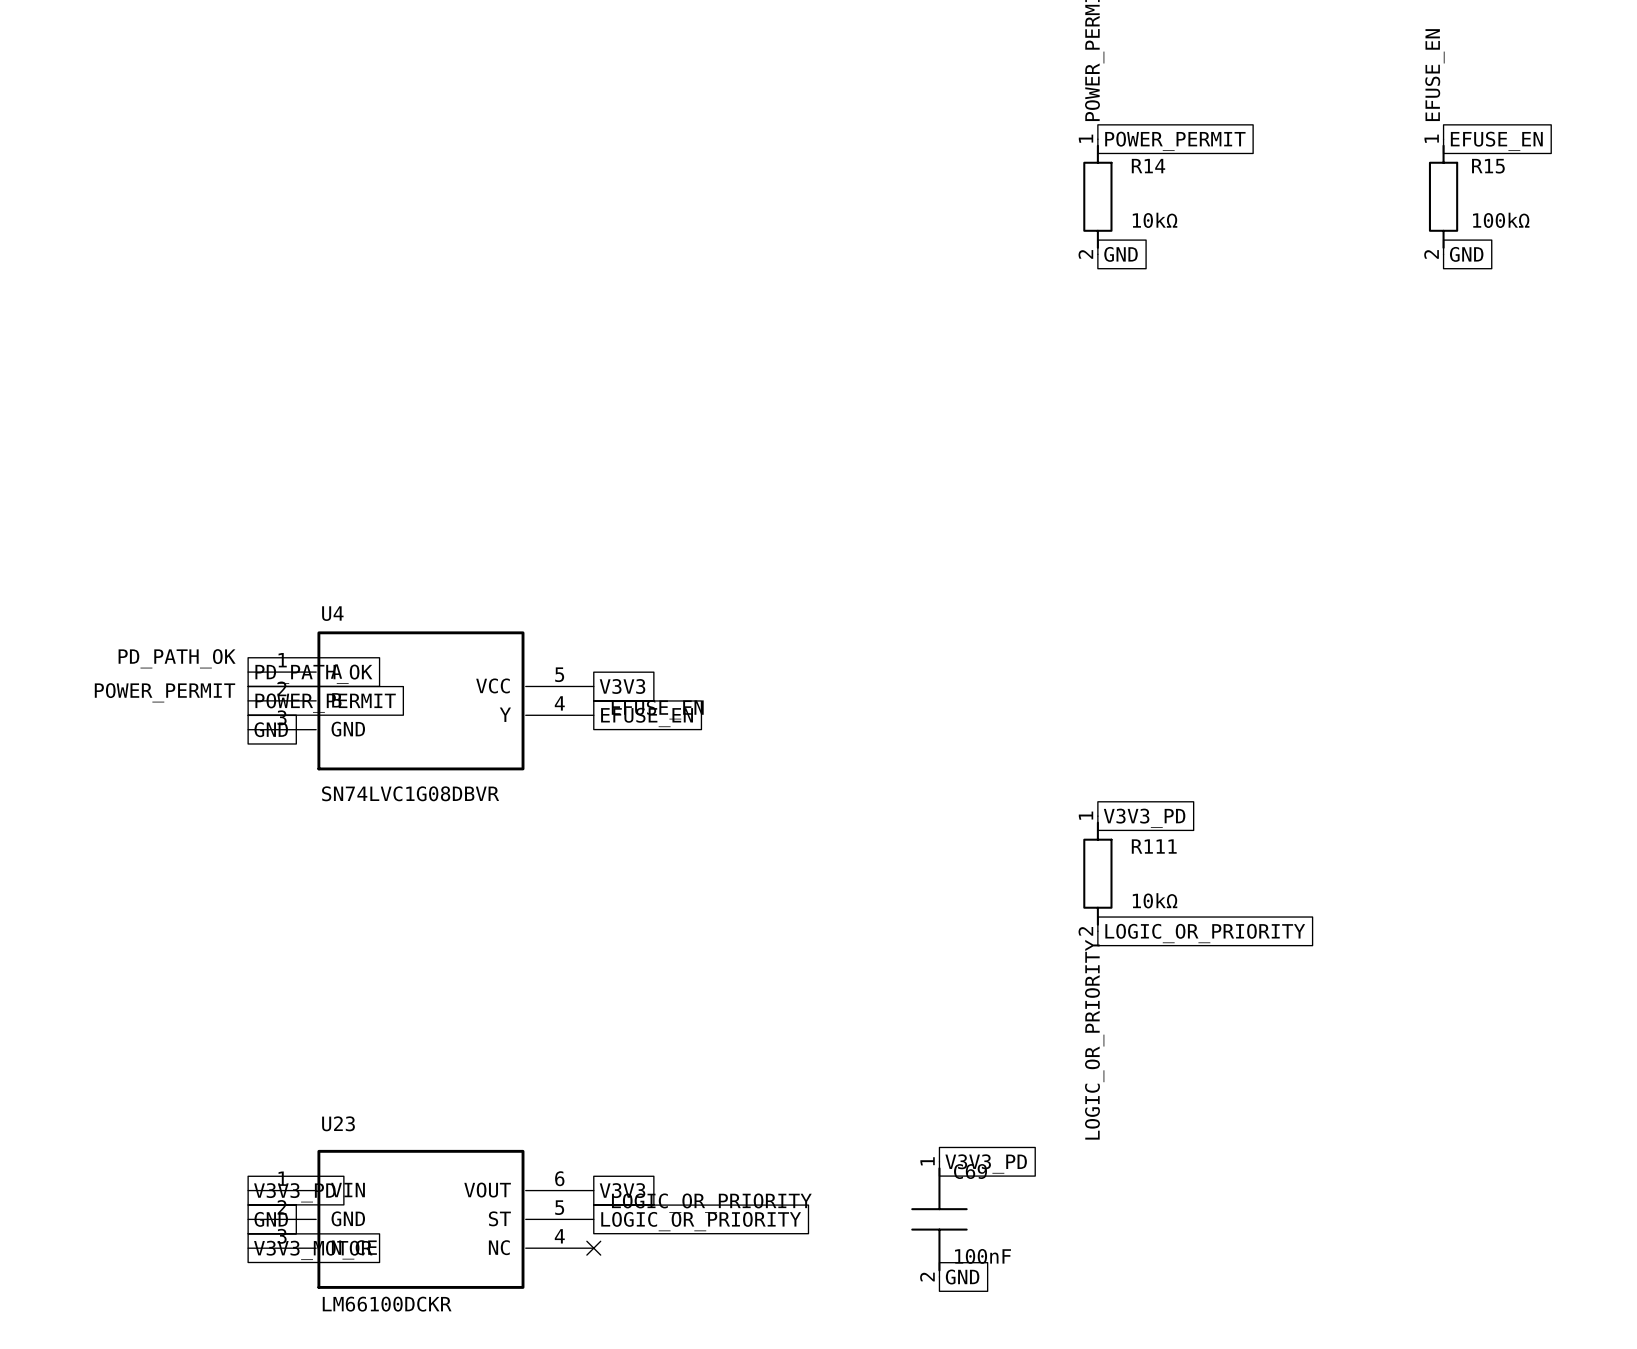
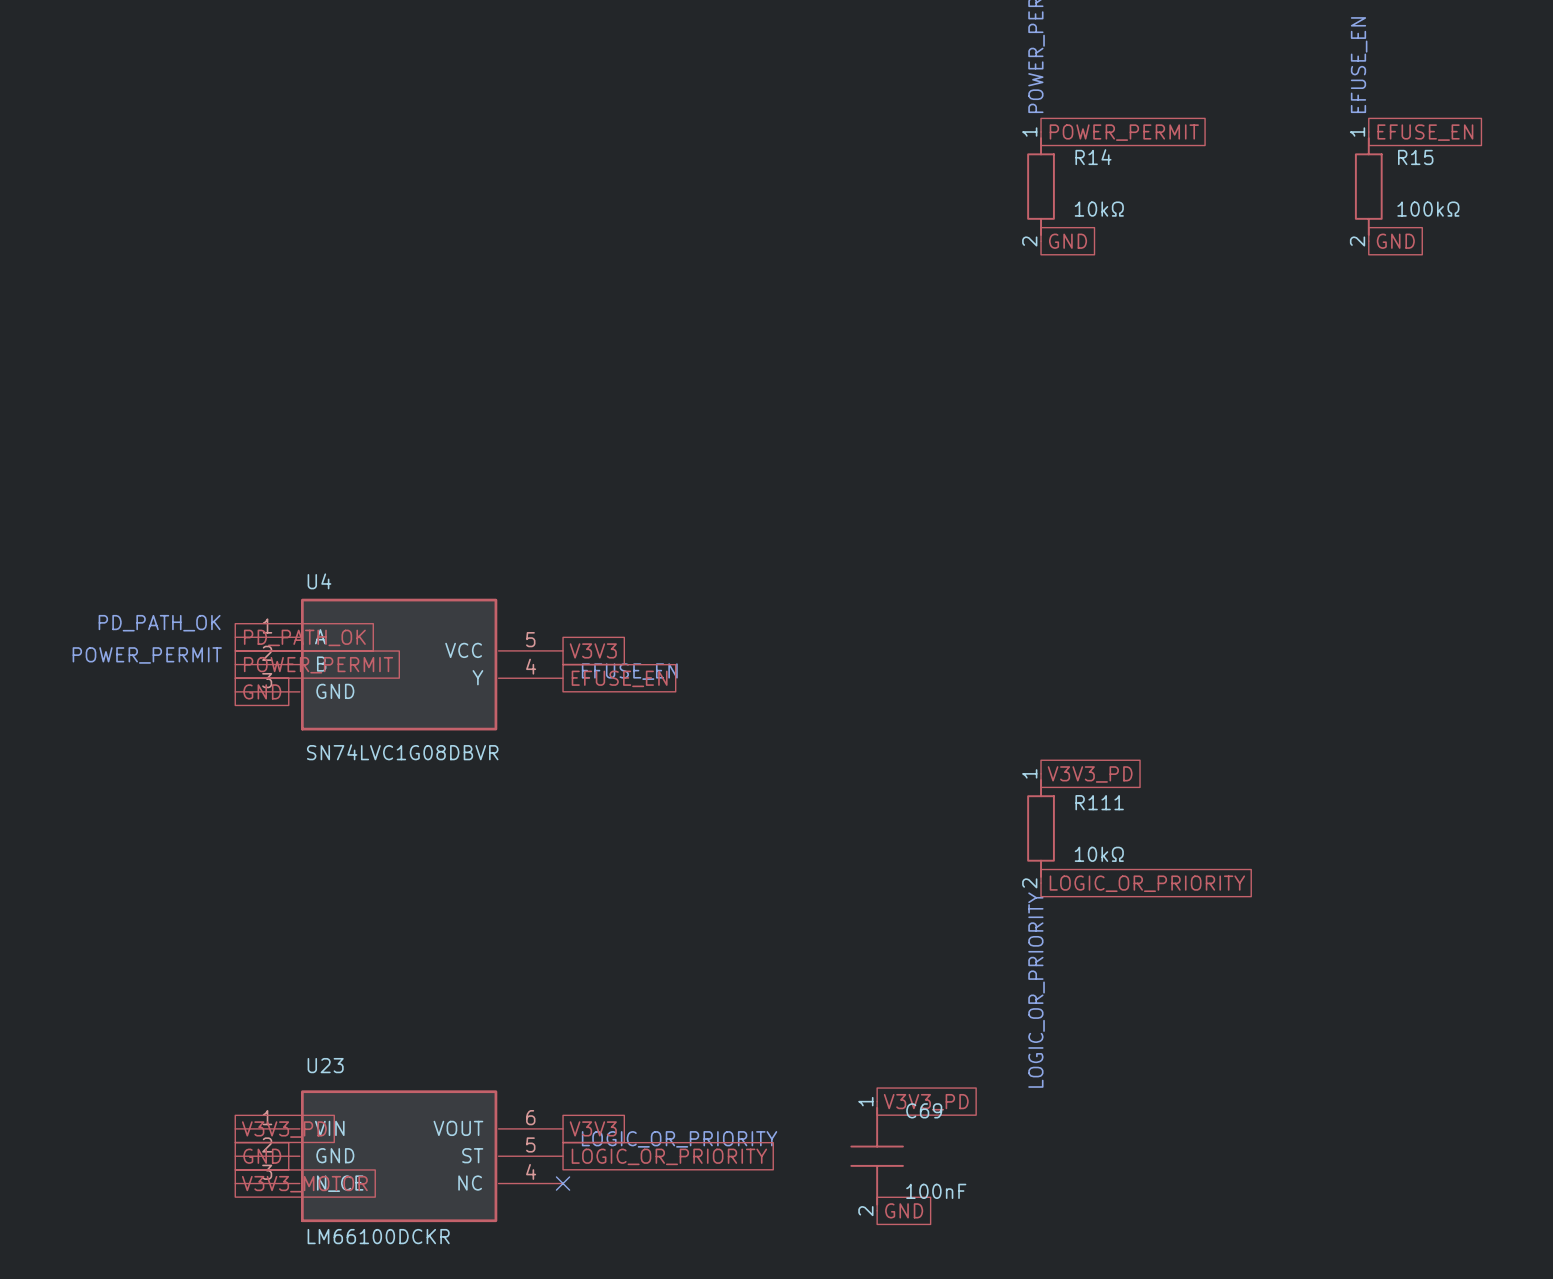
global label position: V3V3_PD (986, 1163) -> V3V3_PD (926, 1102)
C69 position: (939, 1219) -> (877, 1156)
global label position: GND (962, 1277) -> GND (904, 1210)

